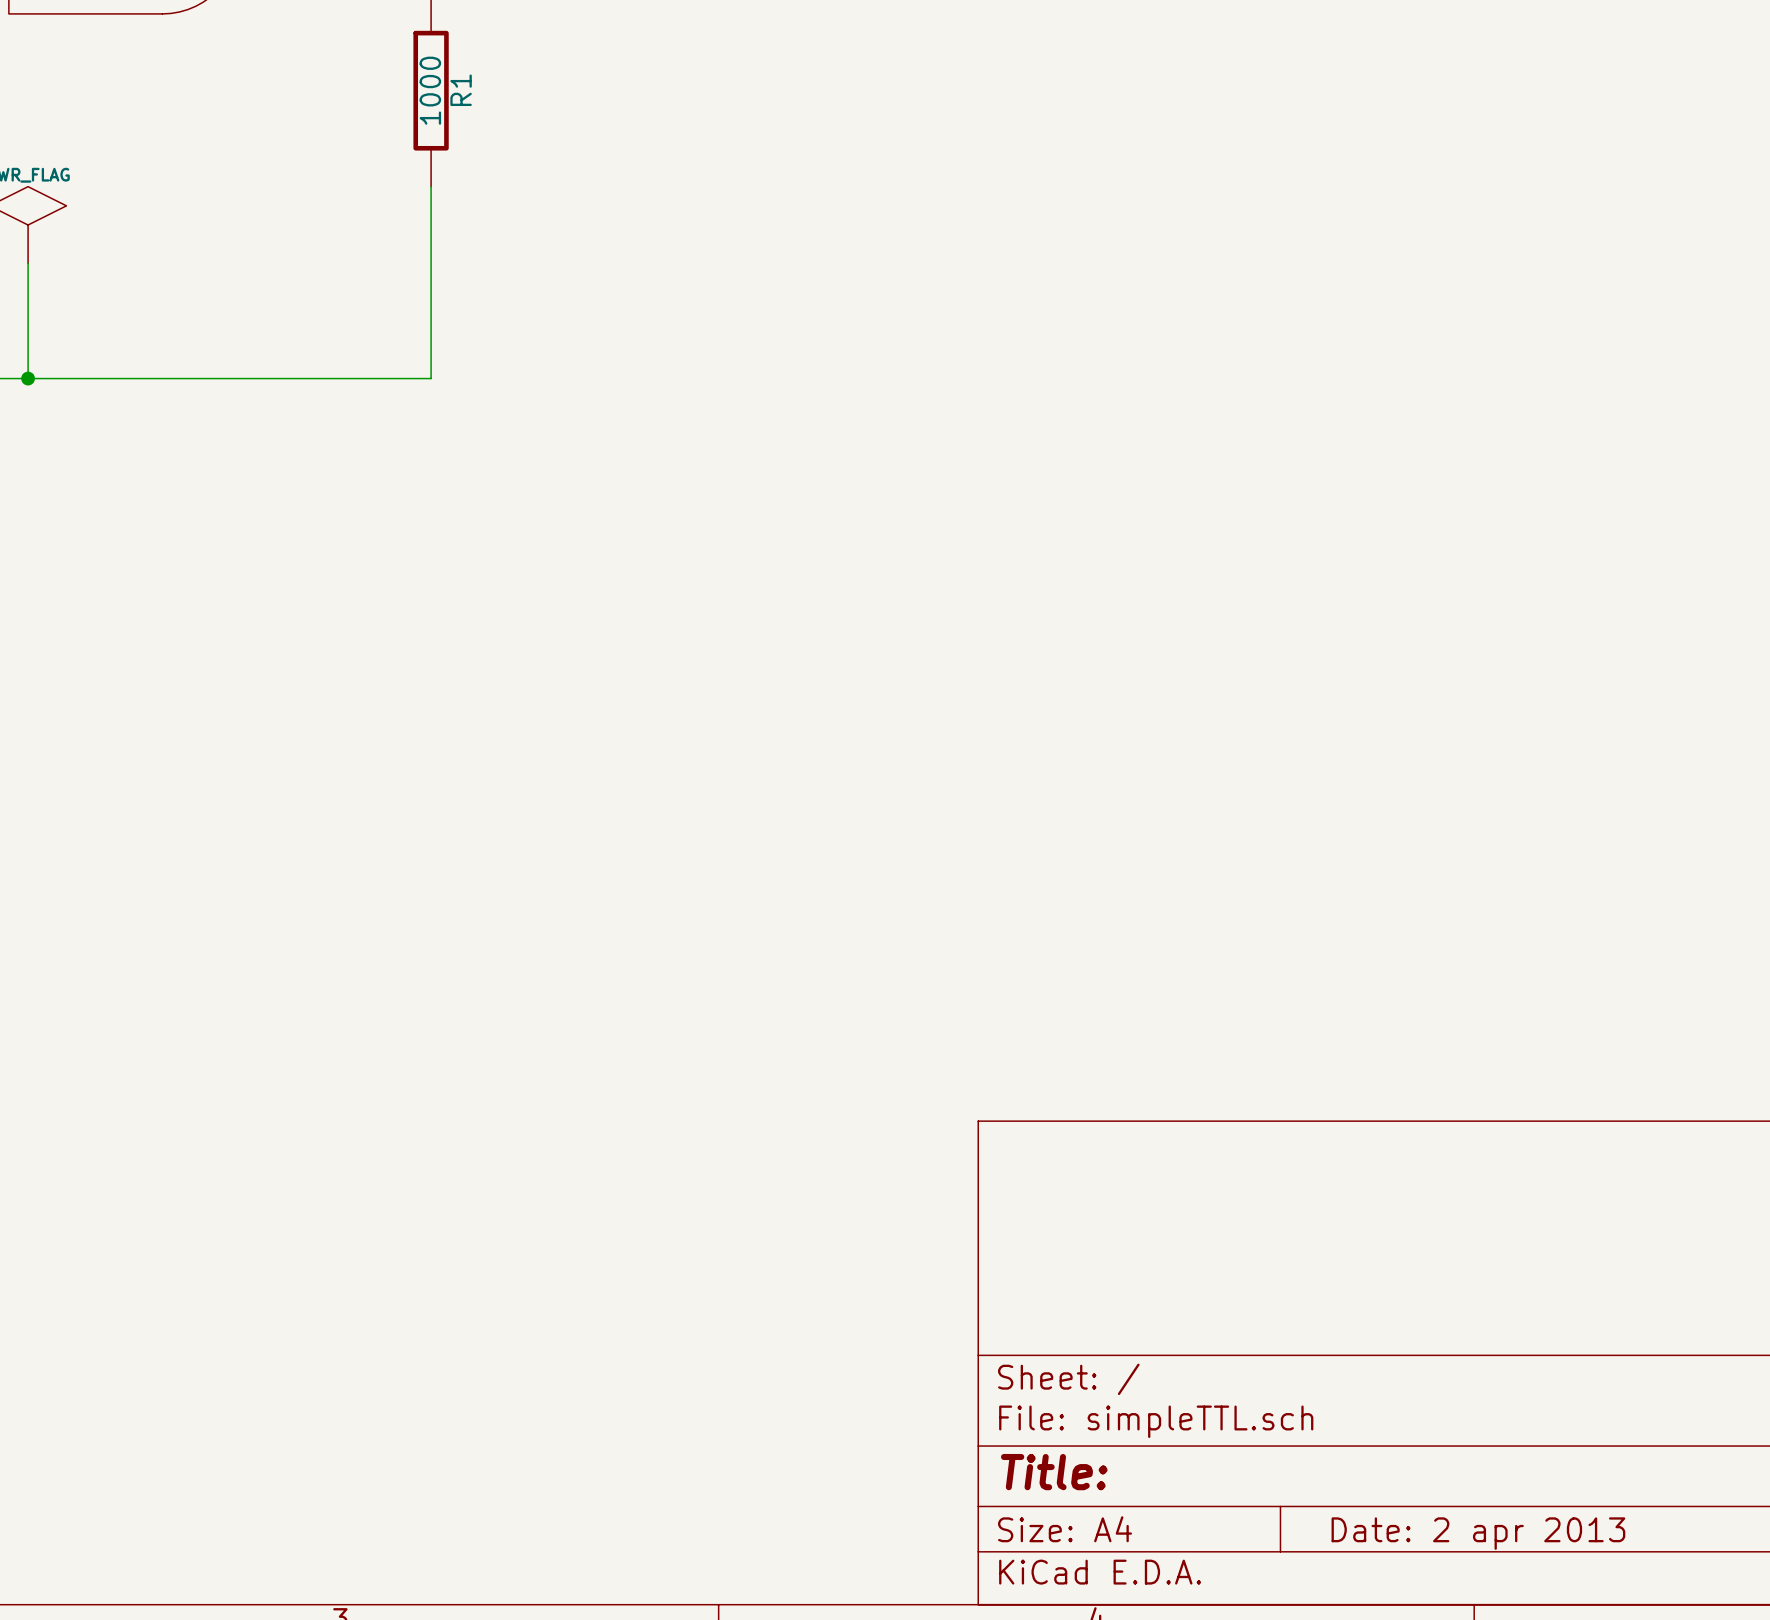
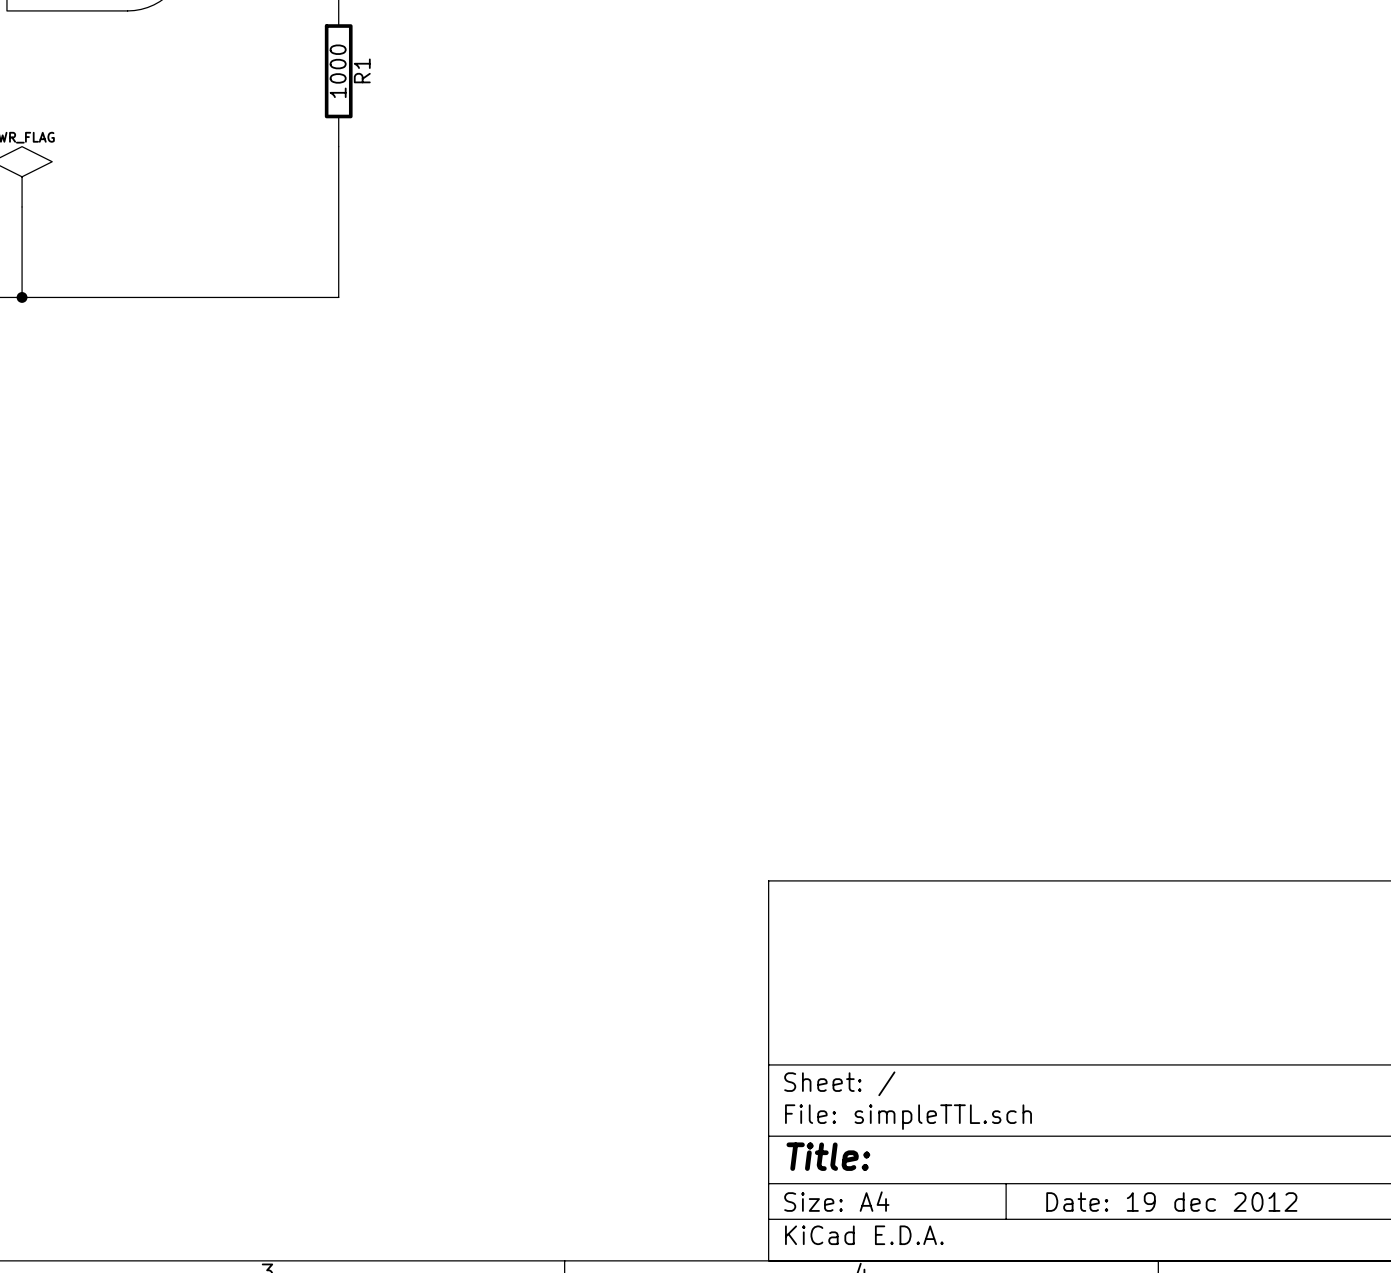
title block: Date: 2 apr 2013 (1478, 1533) -> Date: 19 dec 2012 (1171, 1202)

